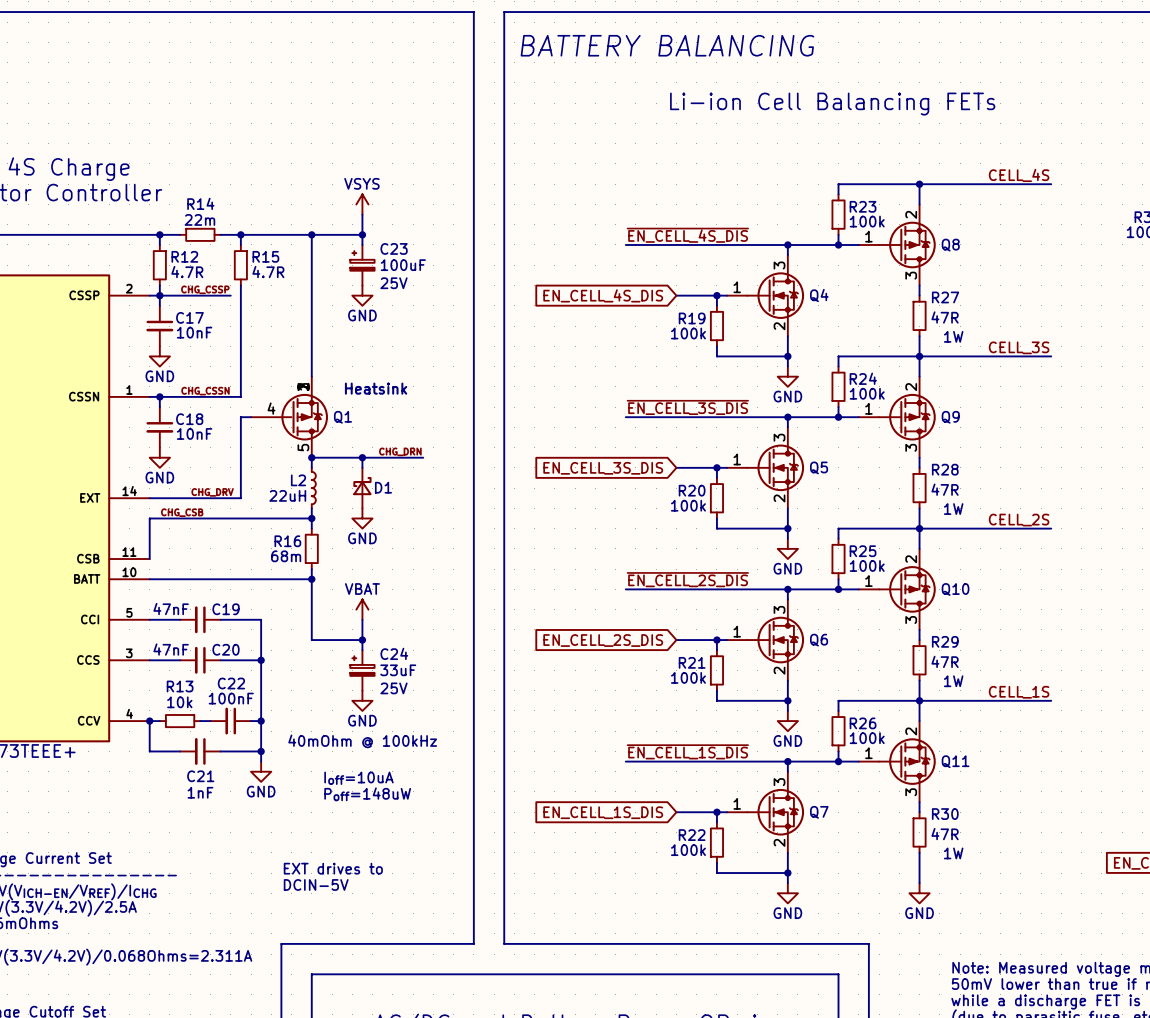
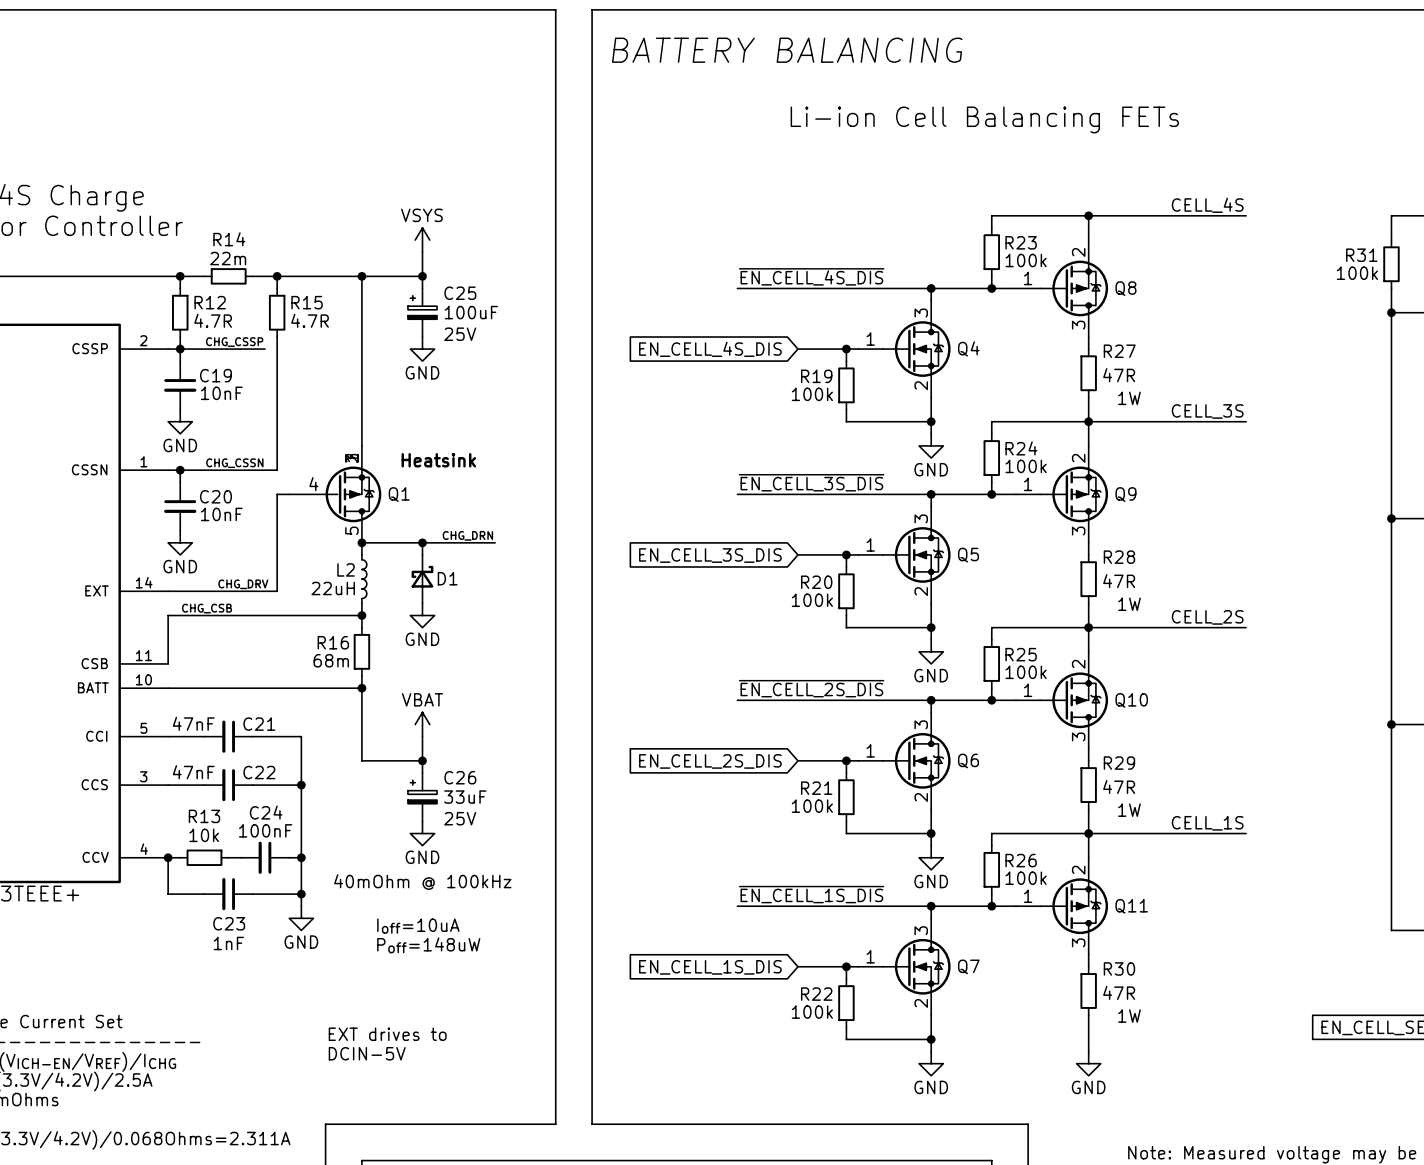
C23 name: C23 (394, 248) -> C25 (460, 293)
C17 name: C17 (189, 317) -> C19 (215, 375)
C18 name: C18 (189, 419) -> C20 (215, 496)
C19 name: C19 (226, 609) -> C21 (259, 724)
C20 name: C20 (226, 649) -> C22 (259, 772)
C24 name: C24 (394, 653) -> C26 (460, 777)
C22 name: C22 (231, 683) -> C24 (266, 812)
C21 name: C21 (200, 776) -> C23 (229, 923)

